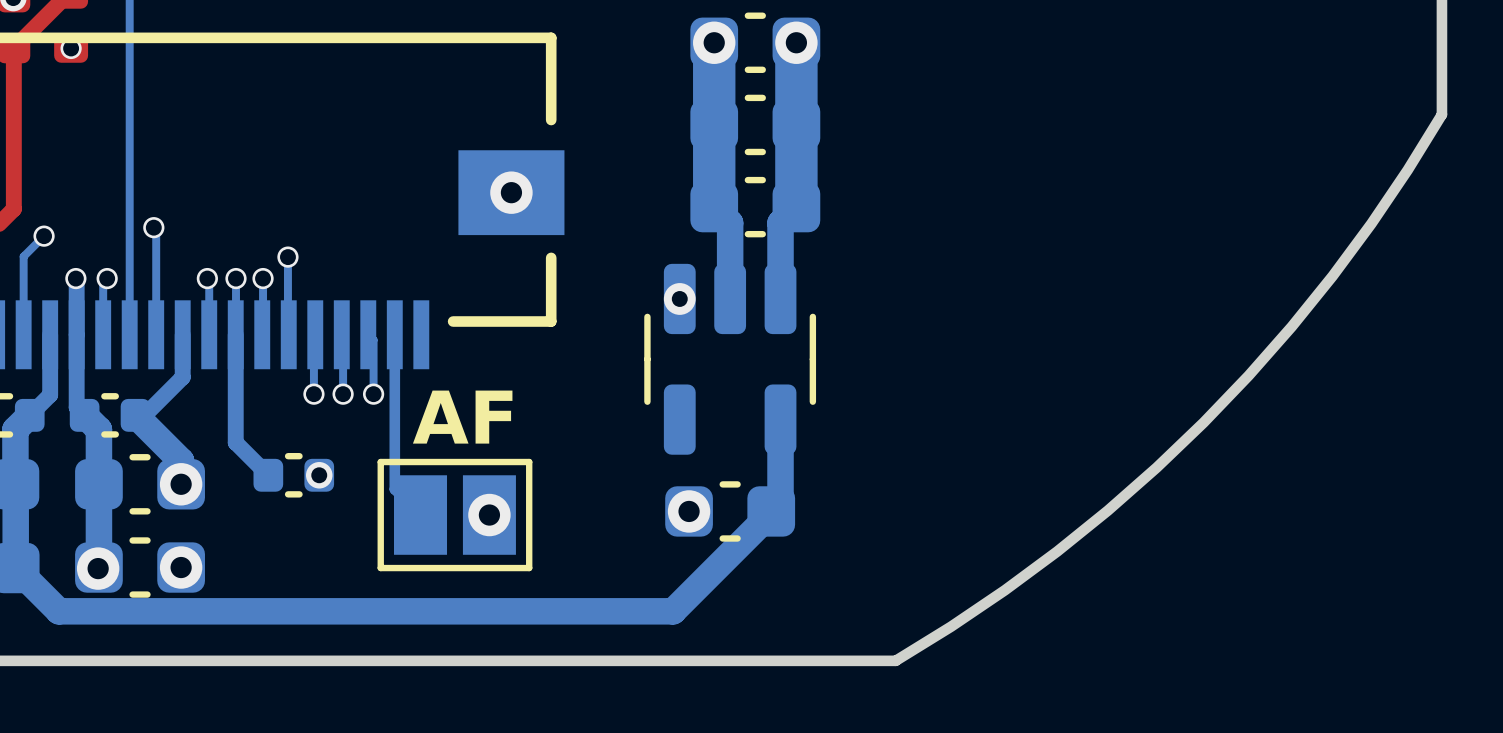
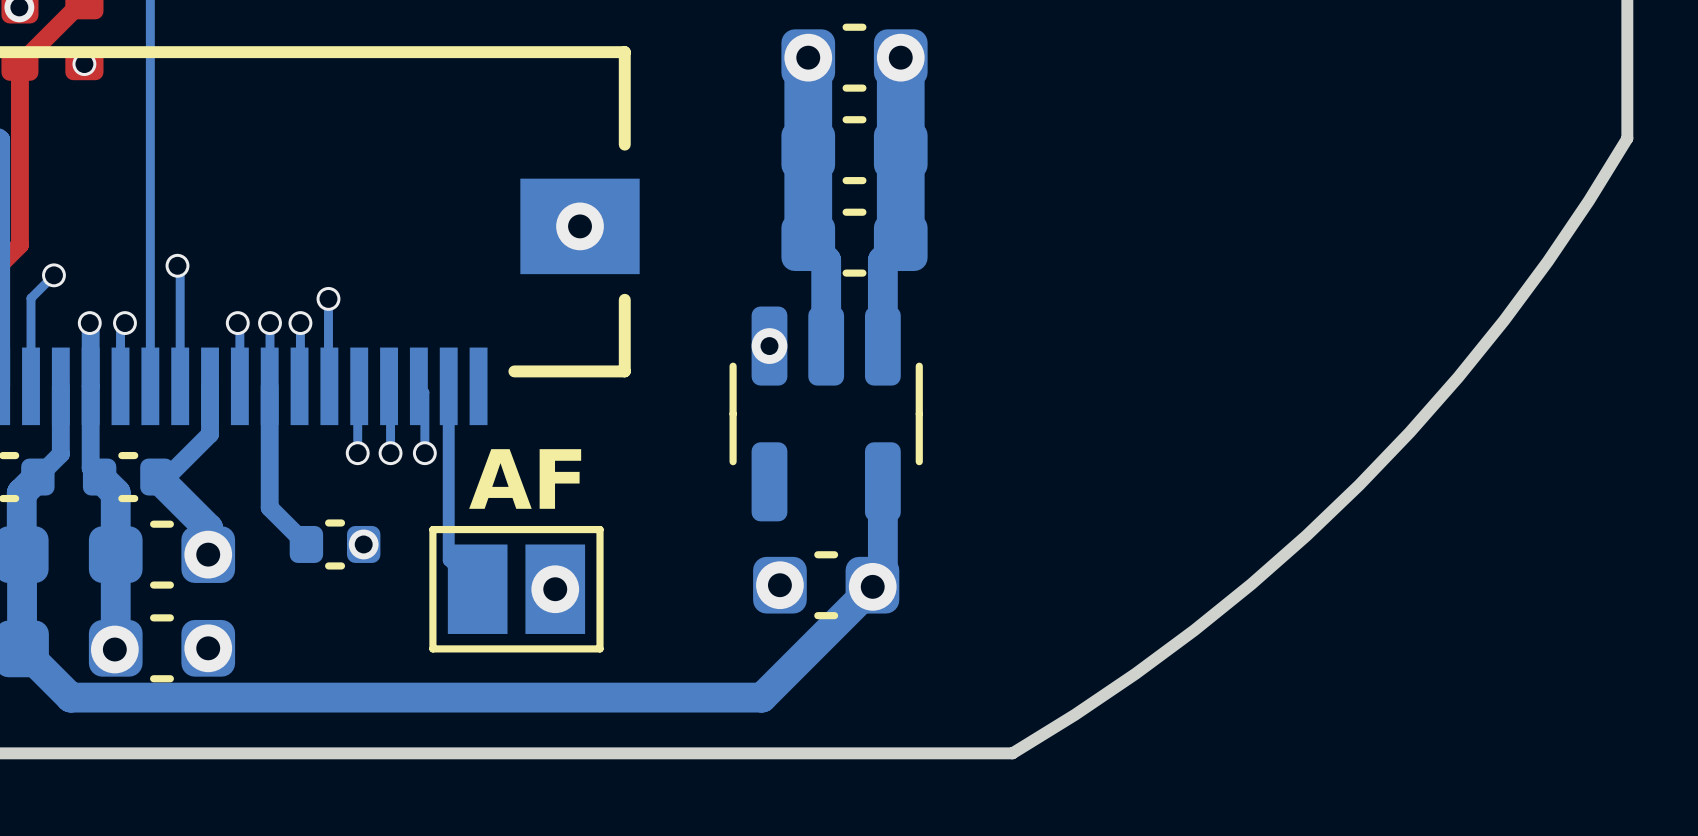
via: none -> (872, 586)

